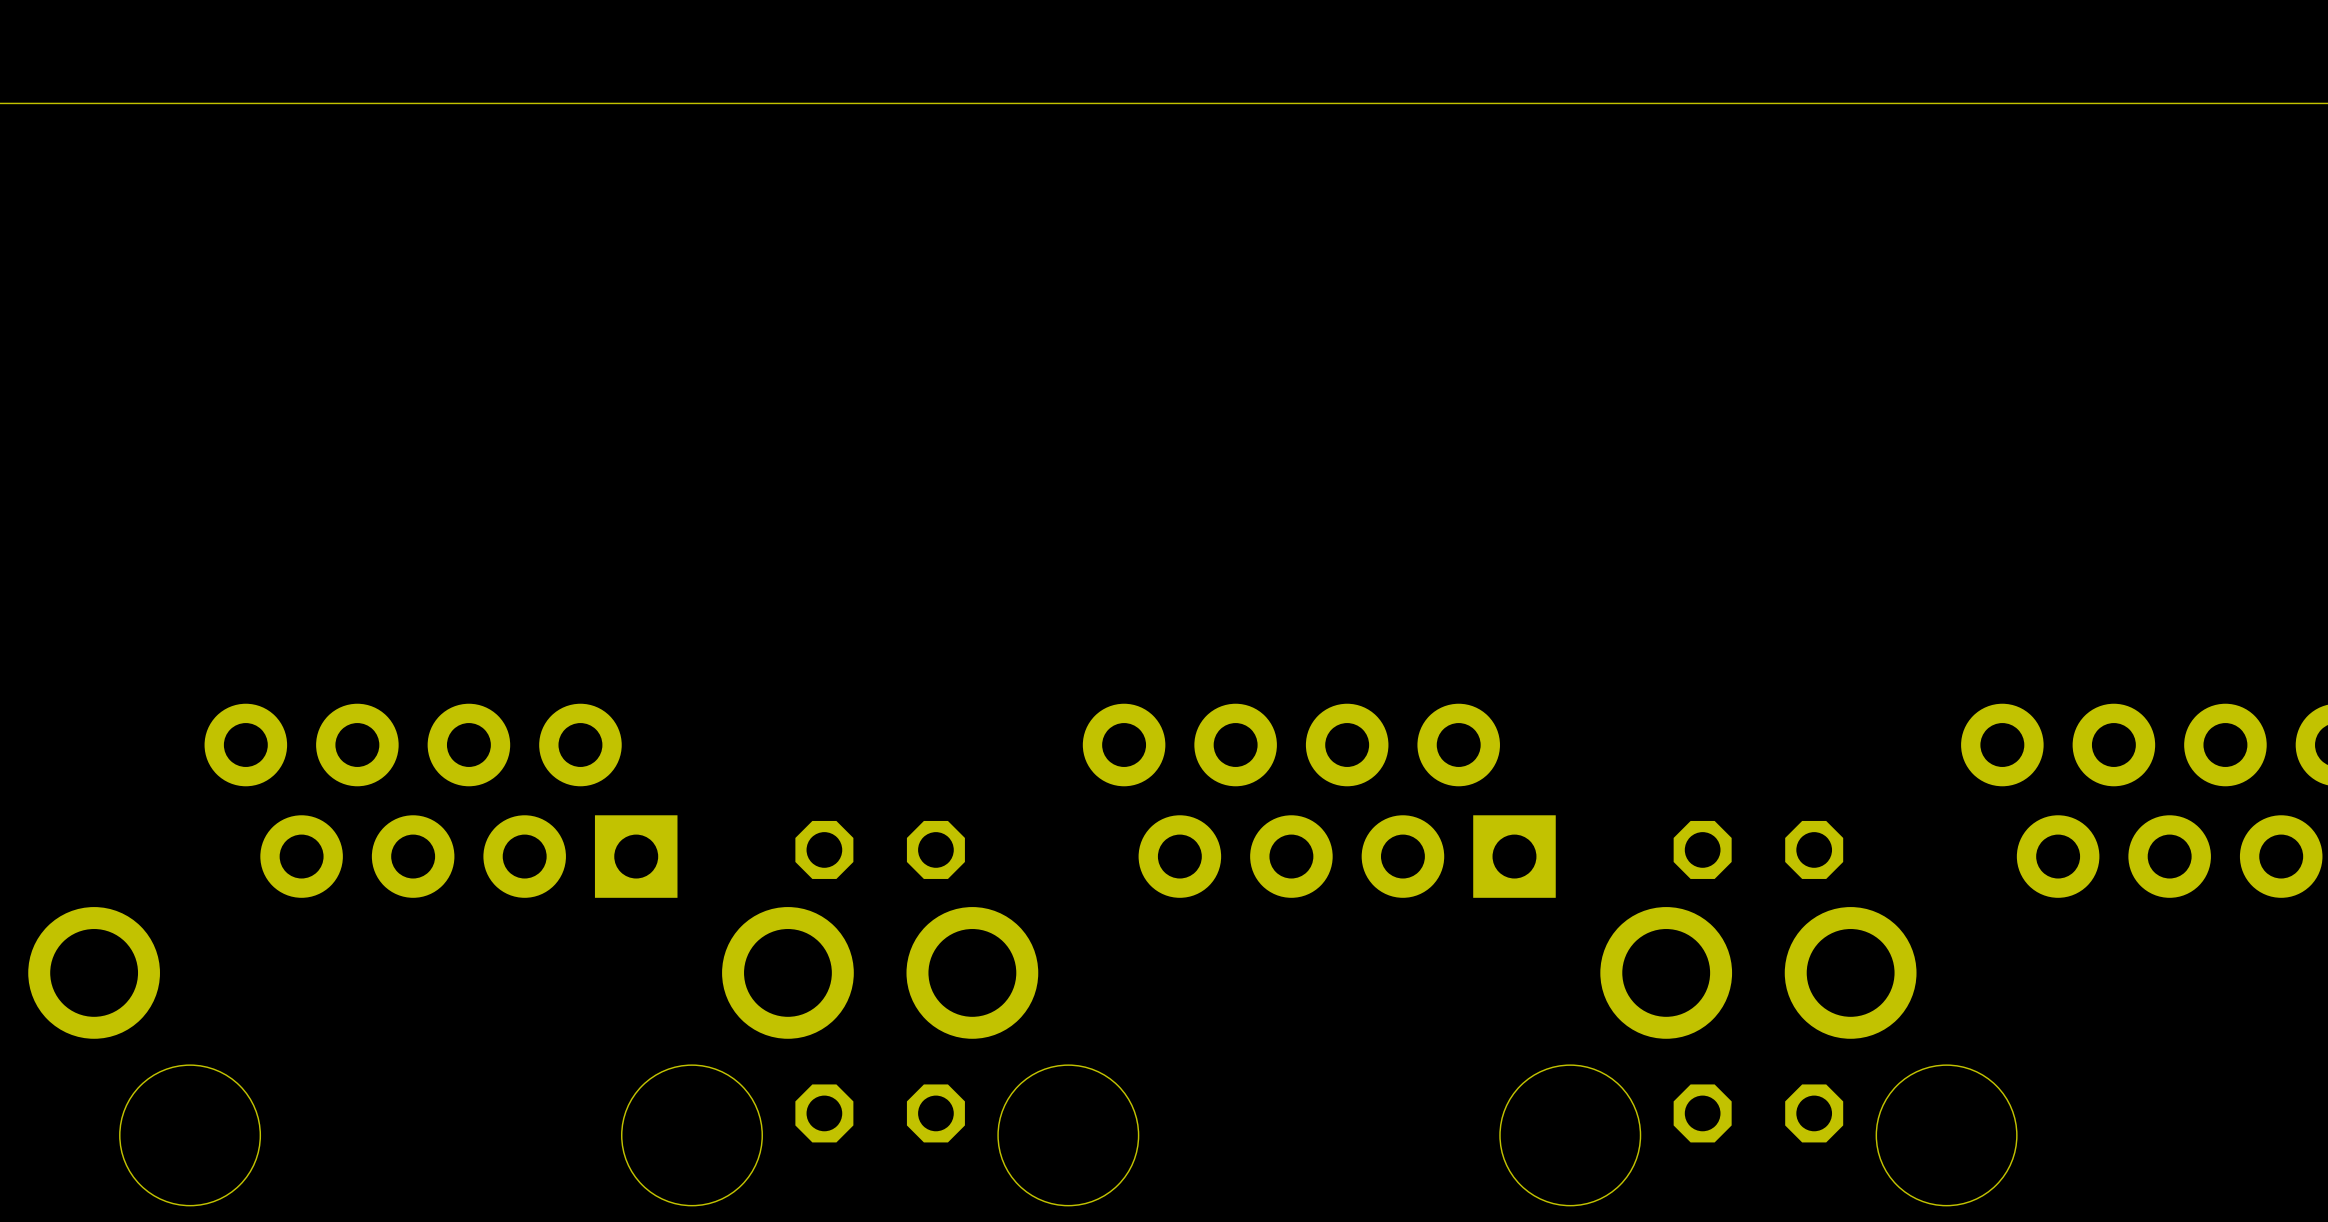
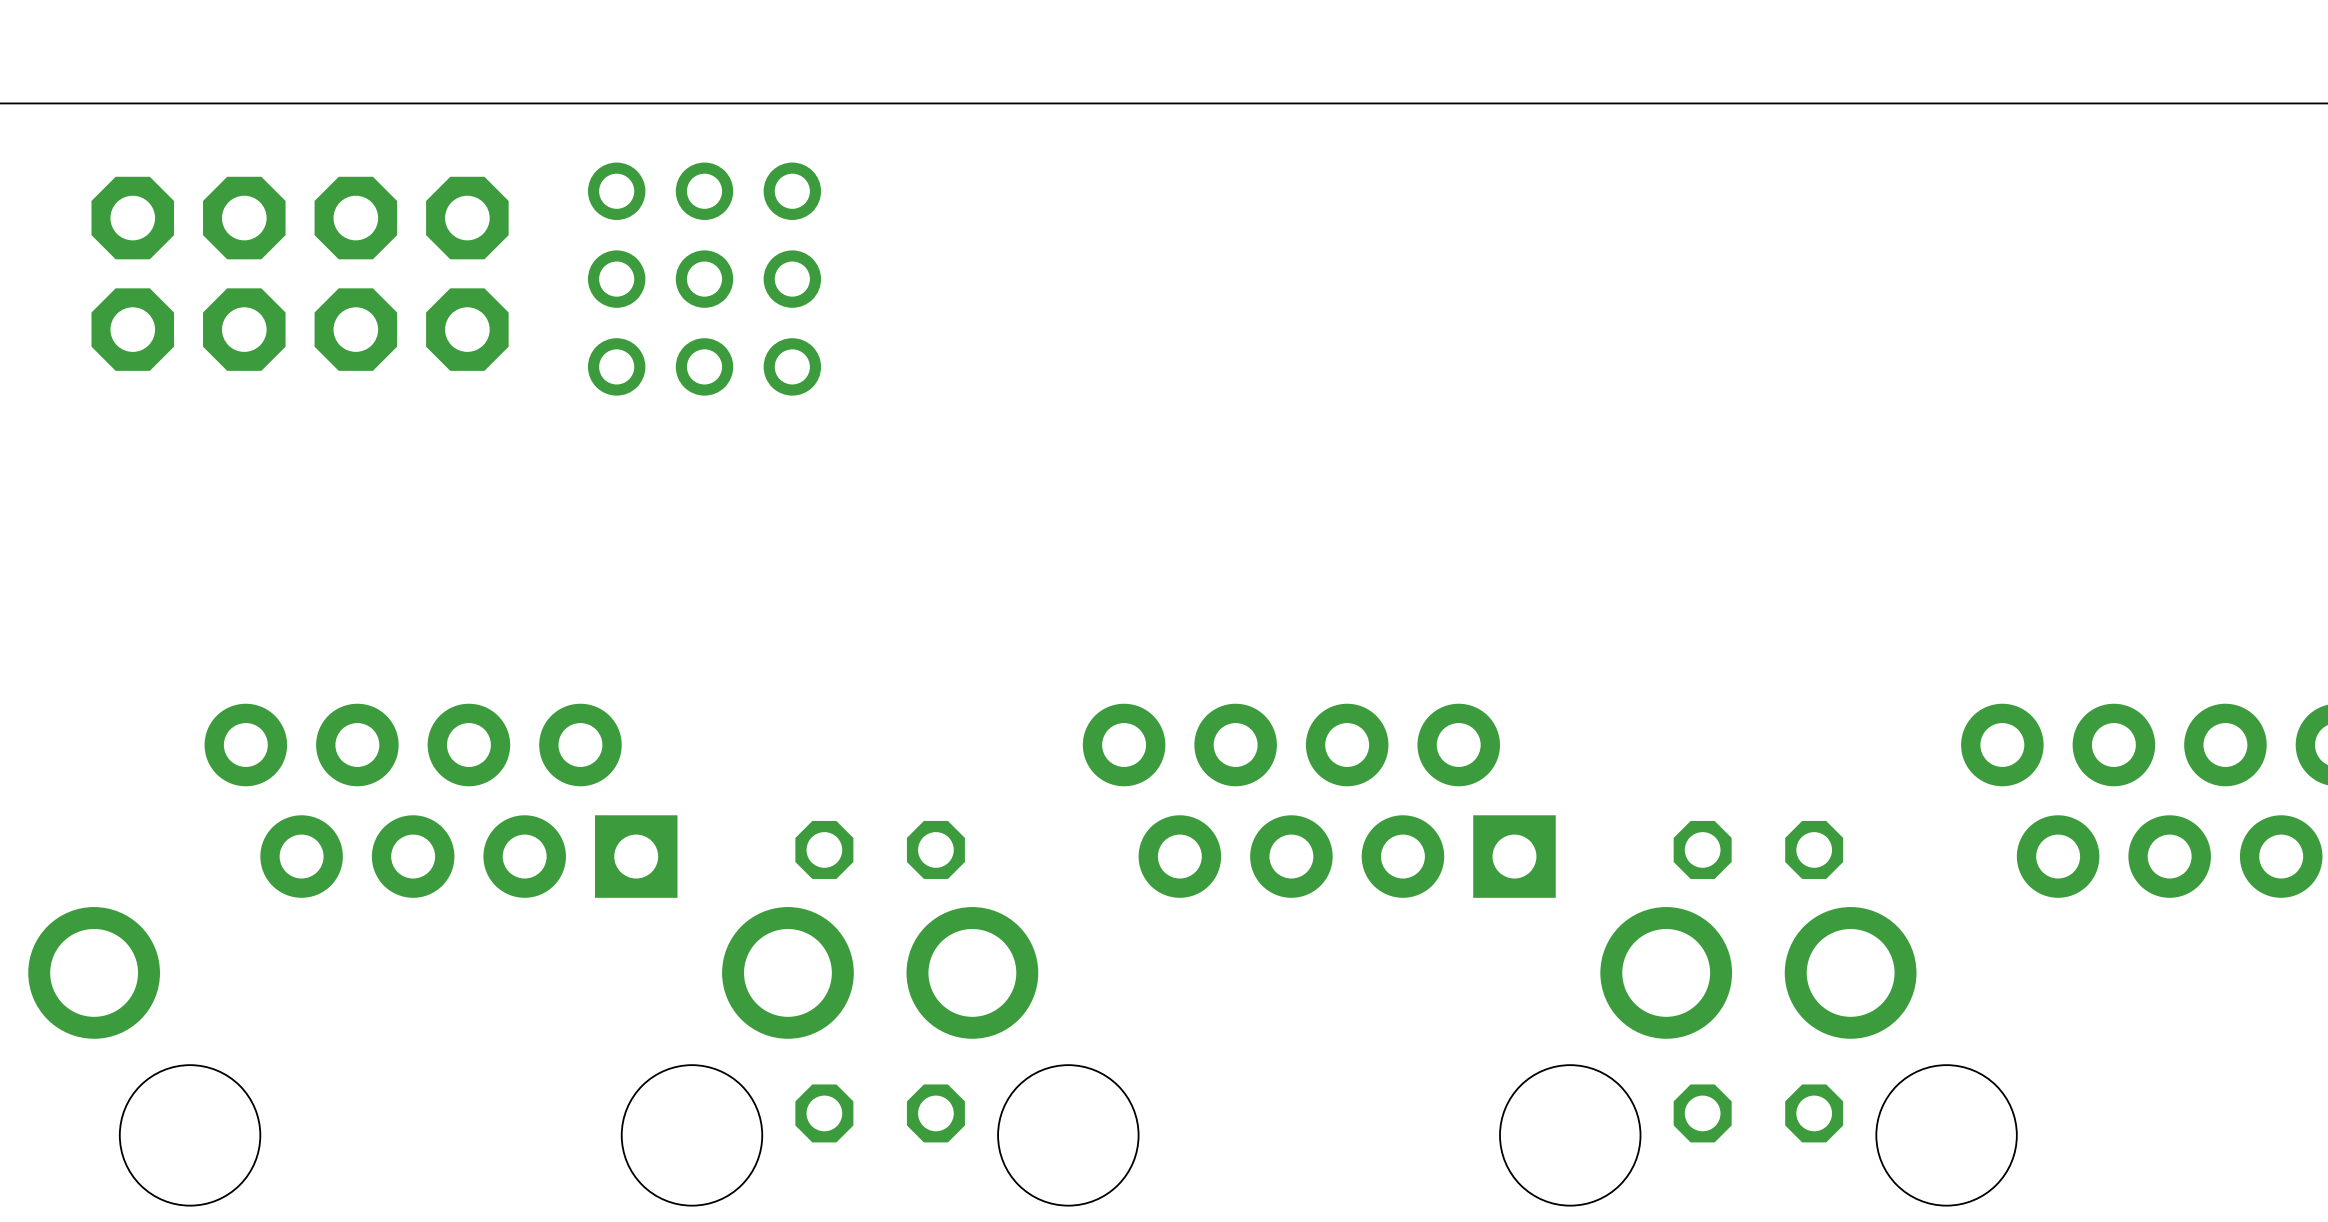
part: none -> (300, 273)
part: none -> (704, 279)

